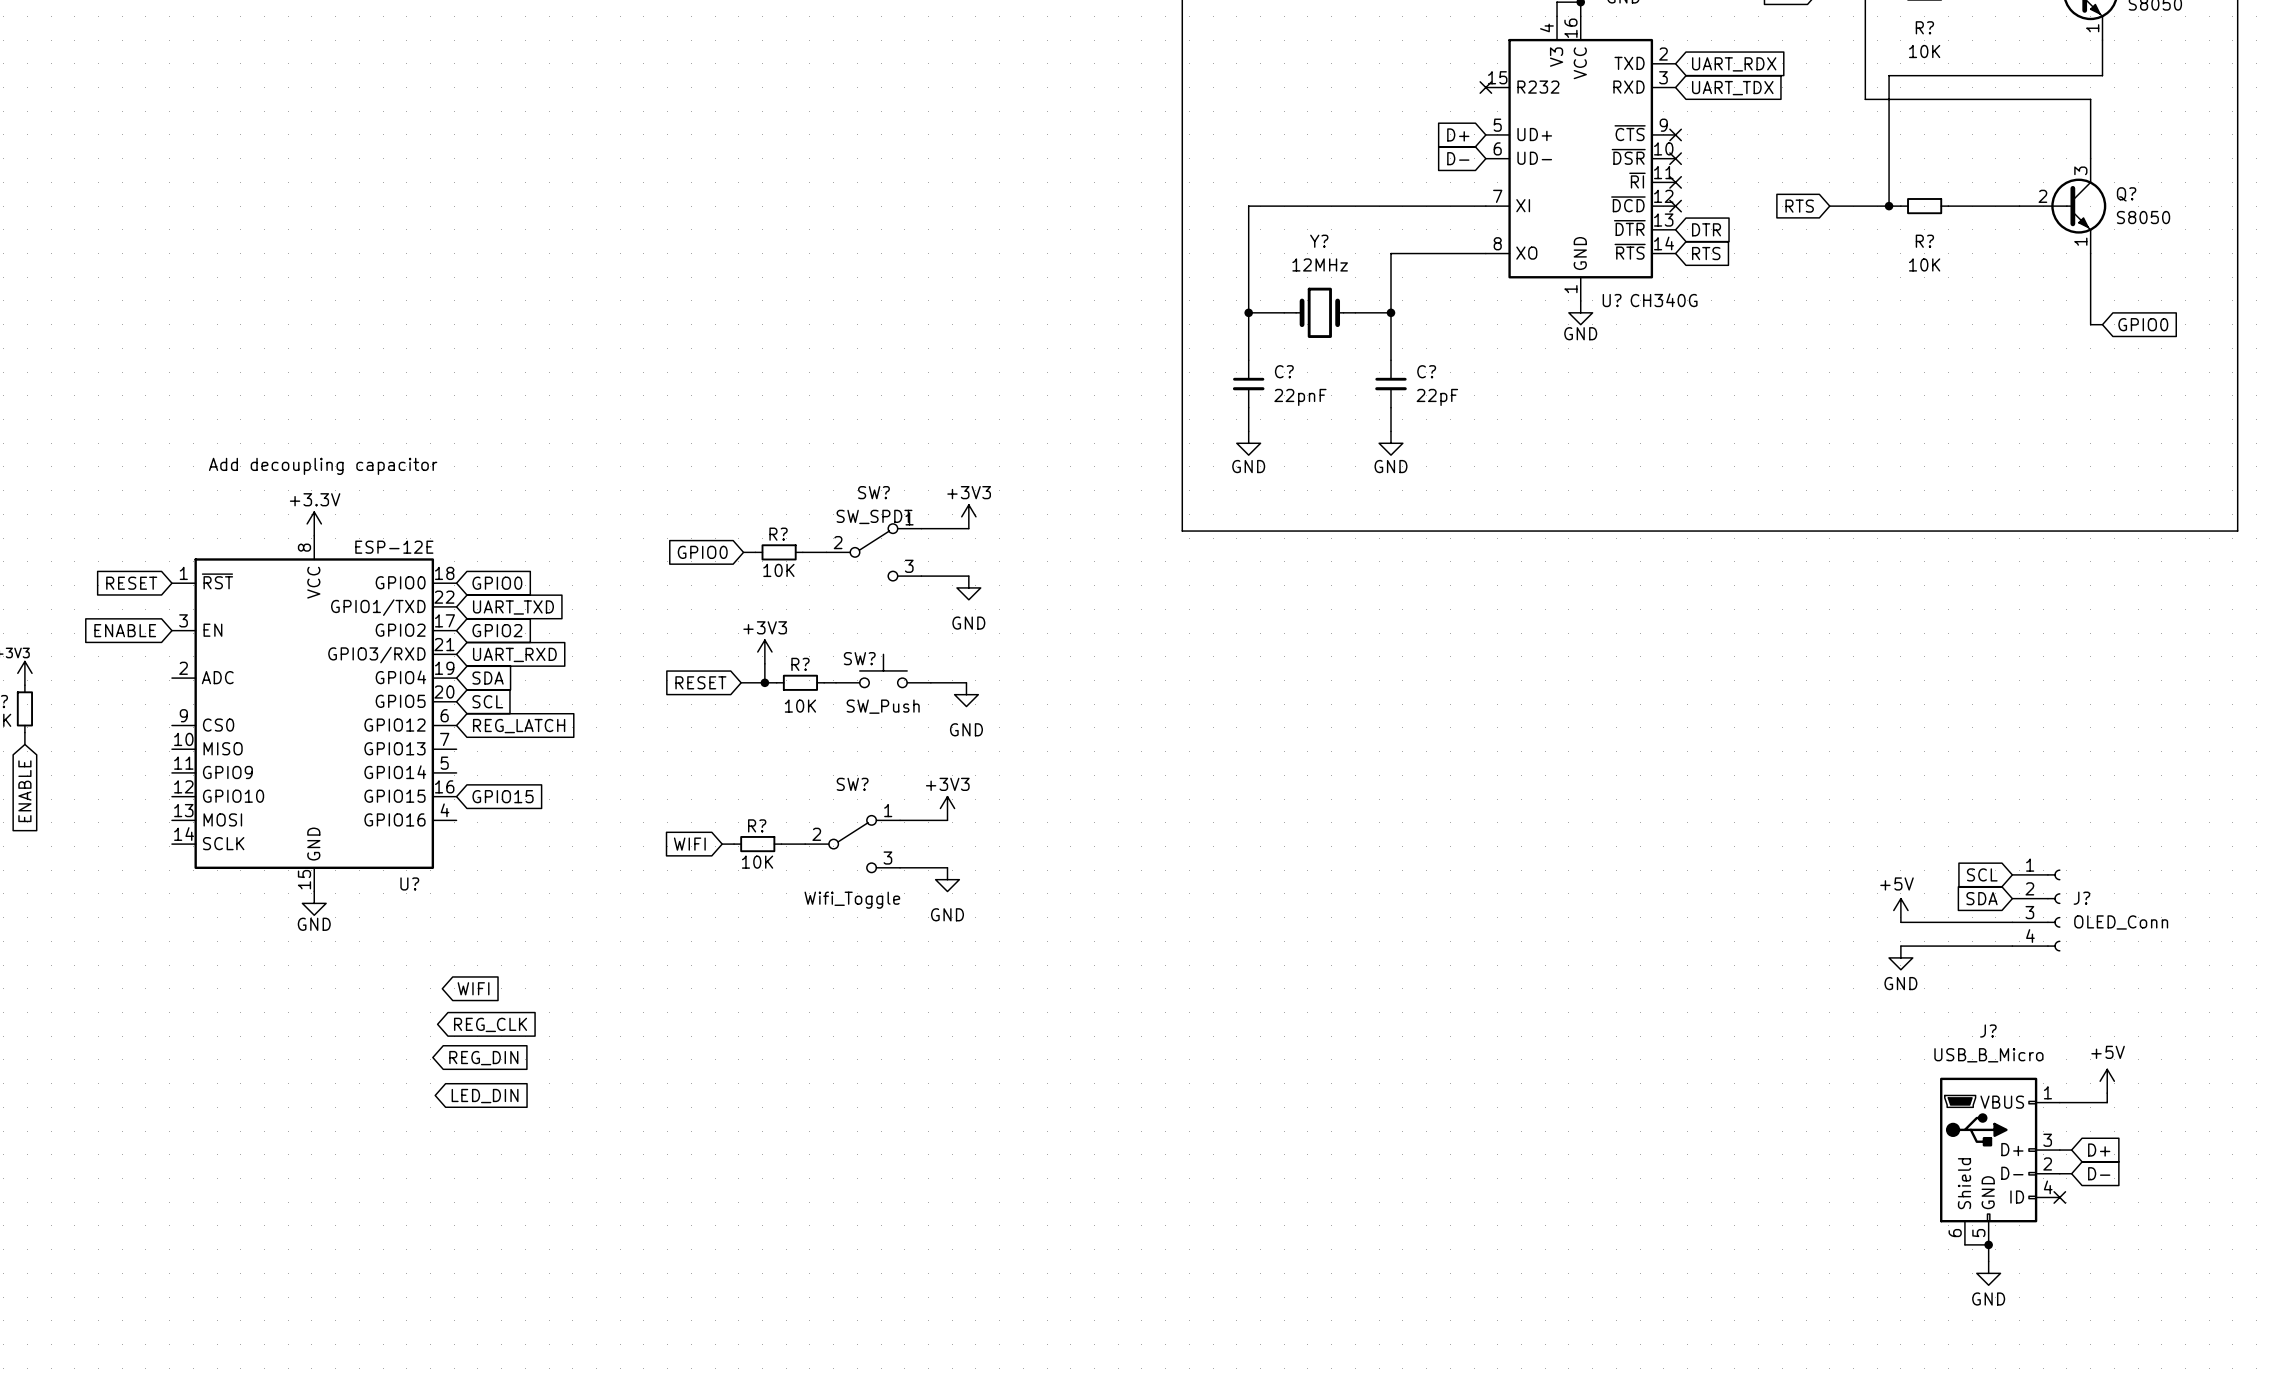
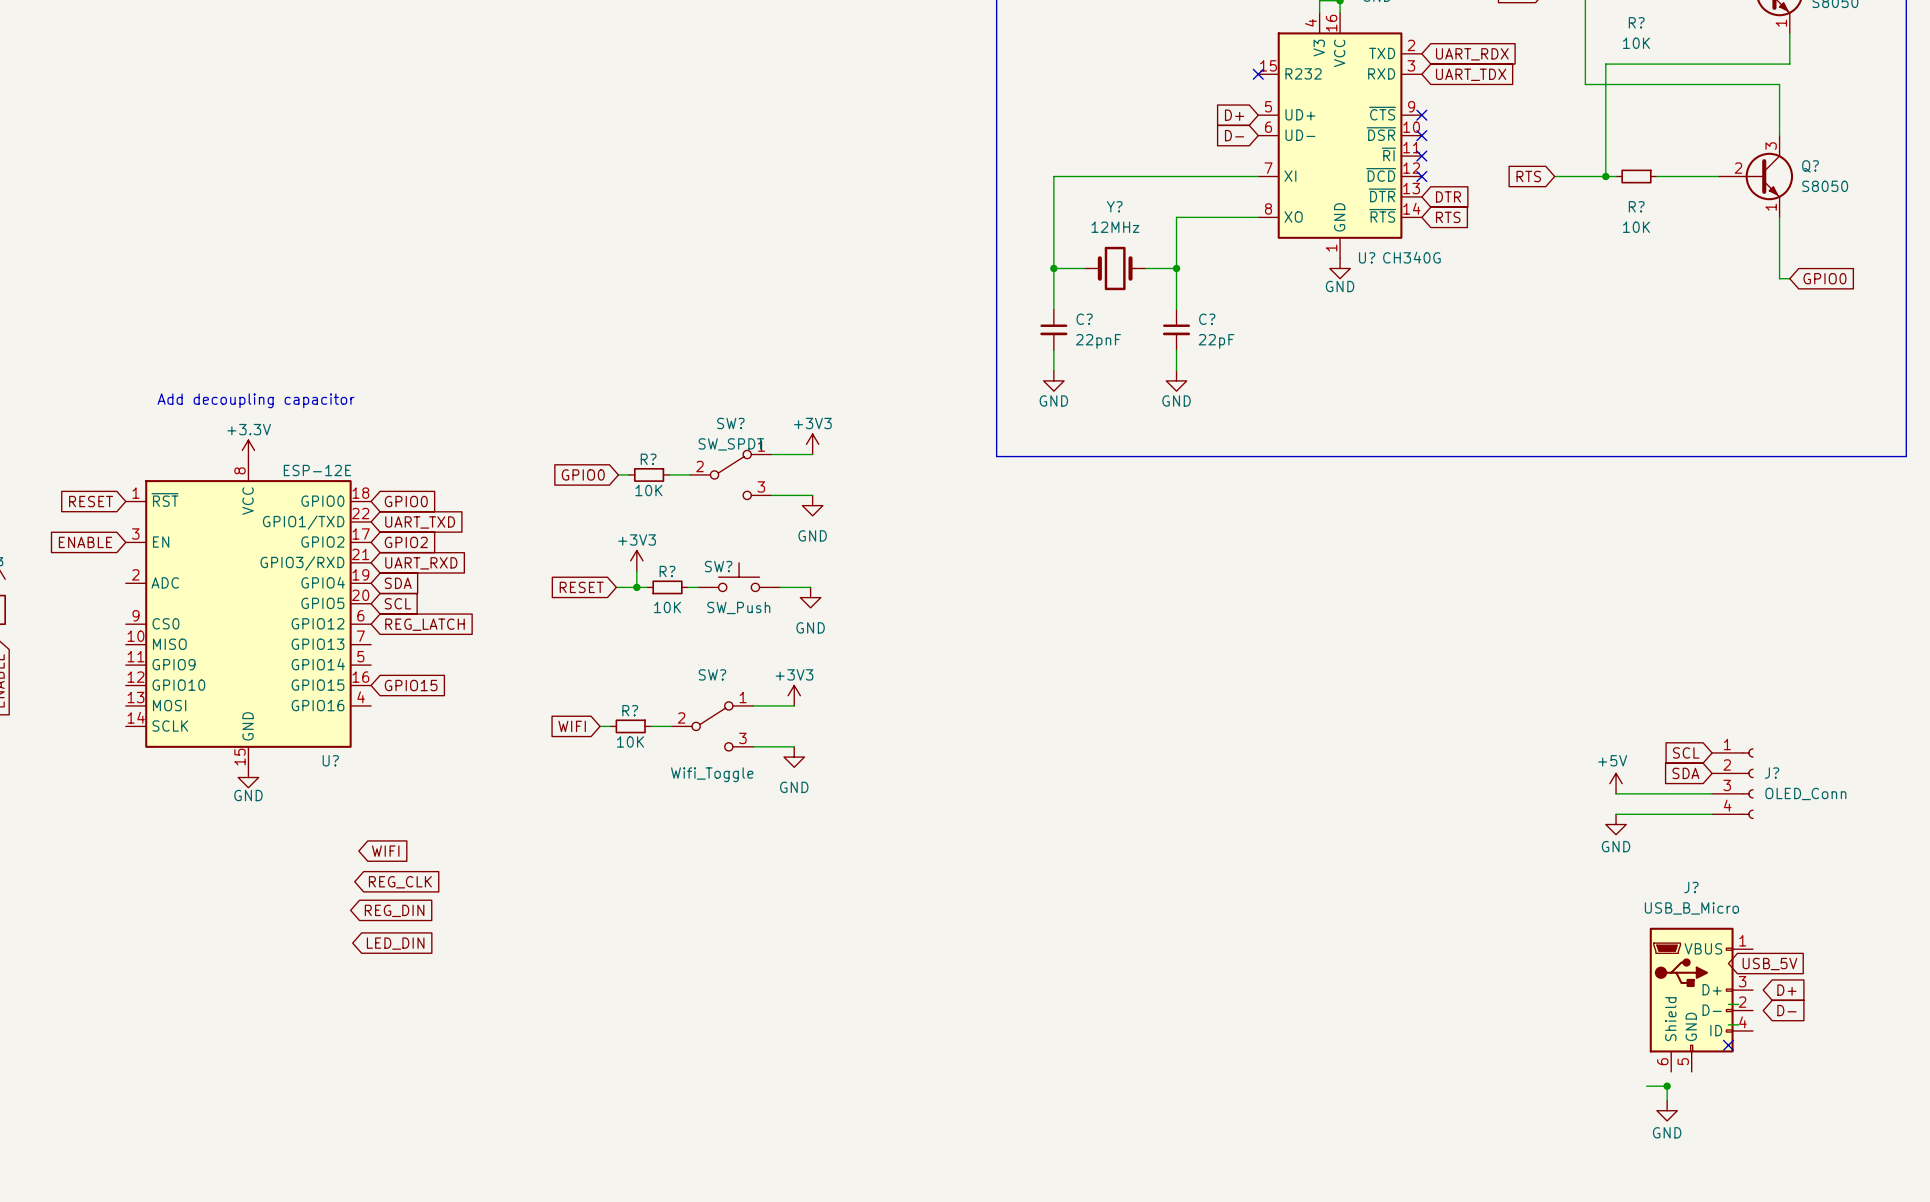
power symbol: +5V (2107, 1081) -> none
wire: (2107, 1093) (2107, 1102) (2059, 1102) -> none
global label: none -> USB_5V (1769, 964)
wire: (2059, 1150) (2071, 1150) -> (1728, 1004) (1738, 1004)
wire: (2059, 1173) (2071, 1173) -> (1728, 1024) (1738, 1024)
no-connect mark position: (2059, 1197) -> (1728, 1045)
wire: (1964, 1244) (1988, 1244) (1988, 1261) -> (1646, 1086) (1667, 1086) (1667, 1100)
junction position: (1988, 1244) -> (1667, 1086)
power symbol position: GND (1988, 1273) -> GND (1667, 1110)

